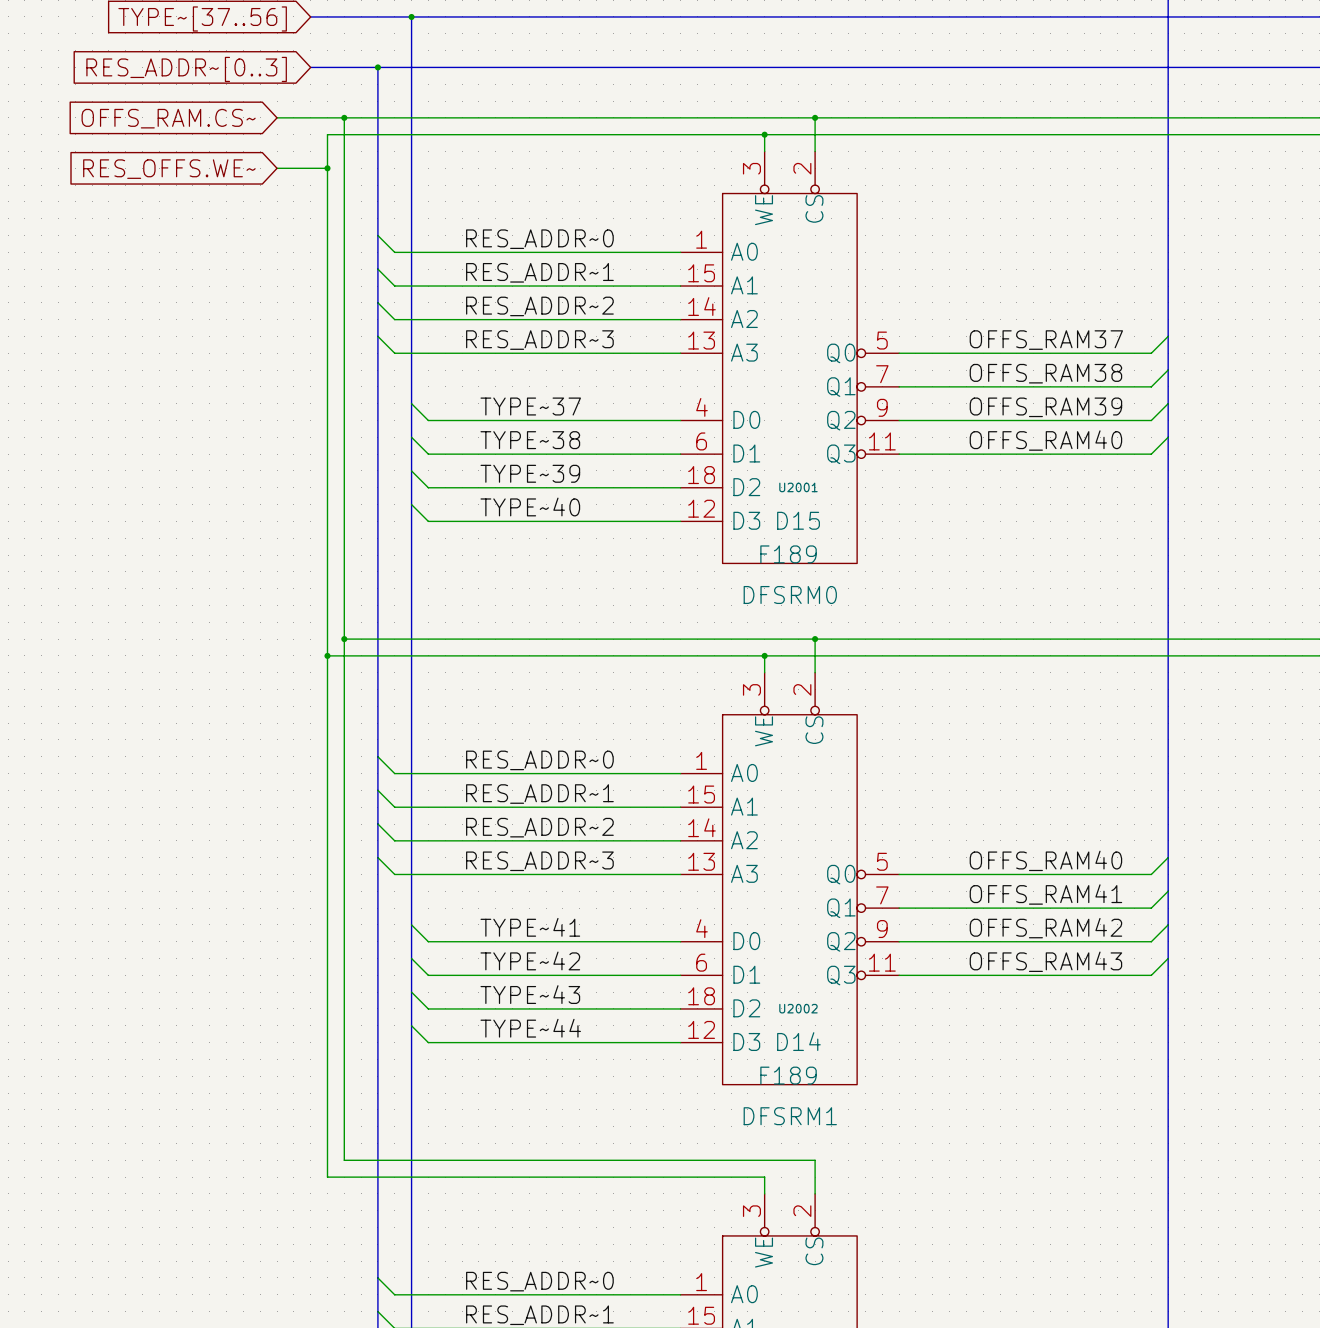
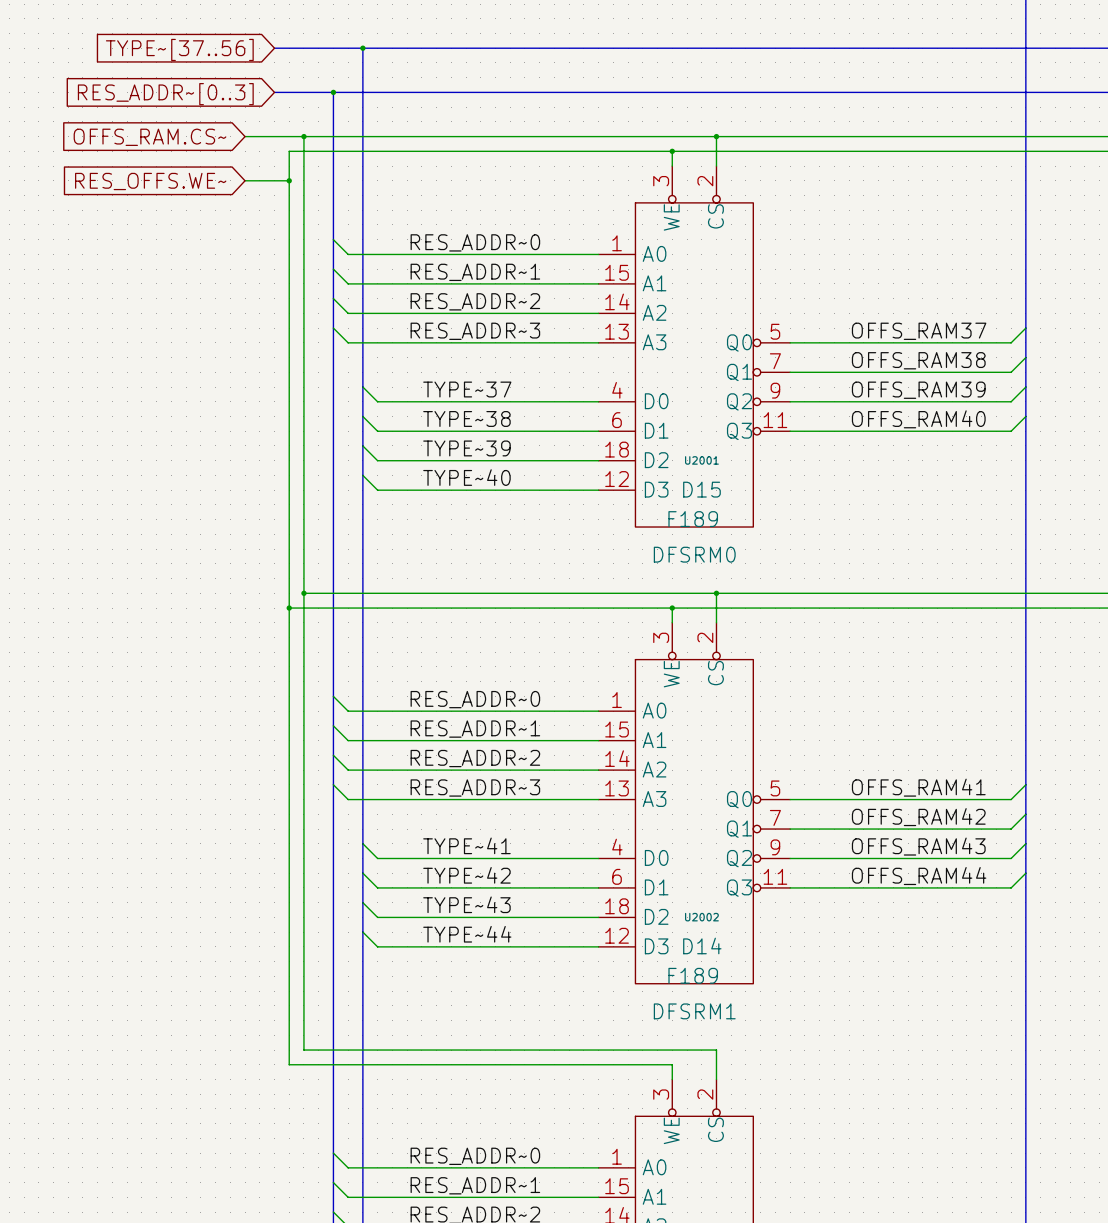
label: OFFS_RAM40 (1045, 860) -> OFFS_RAM41 (918, 787)
label: OFFS_RAM41 (1045, 894) -> OFFS_RAM42 (918, 817)
label: OFFS_RAM42 (1045, 928) -> OFFS_RAM43 (918, 846)
label: OFFS_RAM43 (1045, 961) -> OFFS_RAM44 (919, 876)

